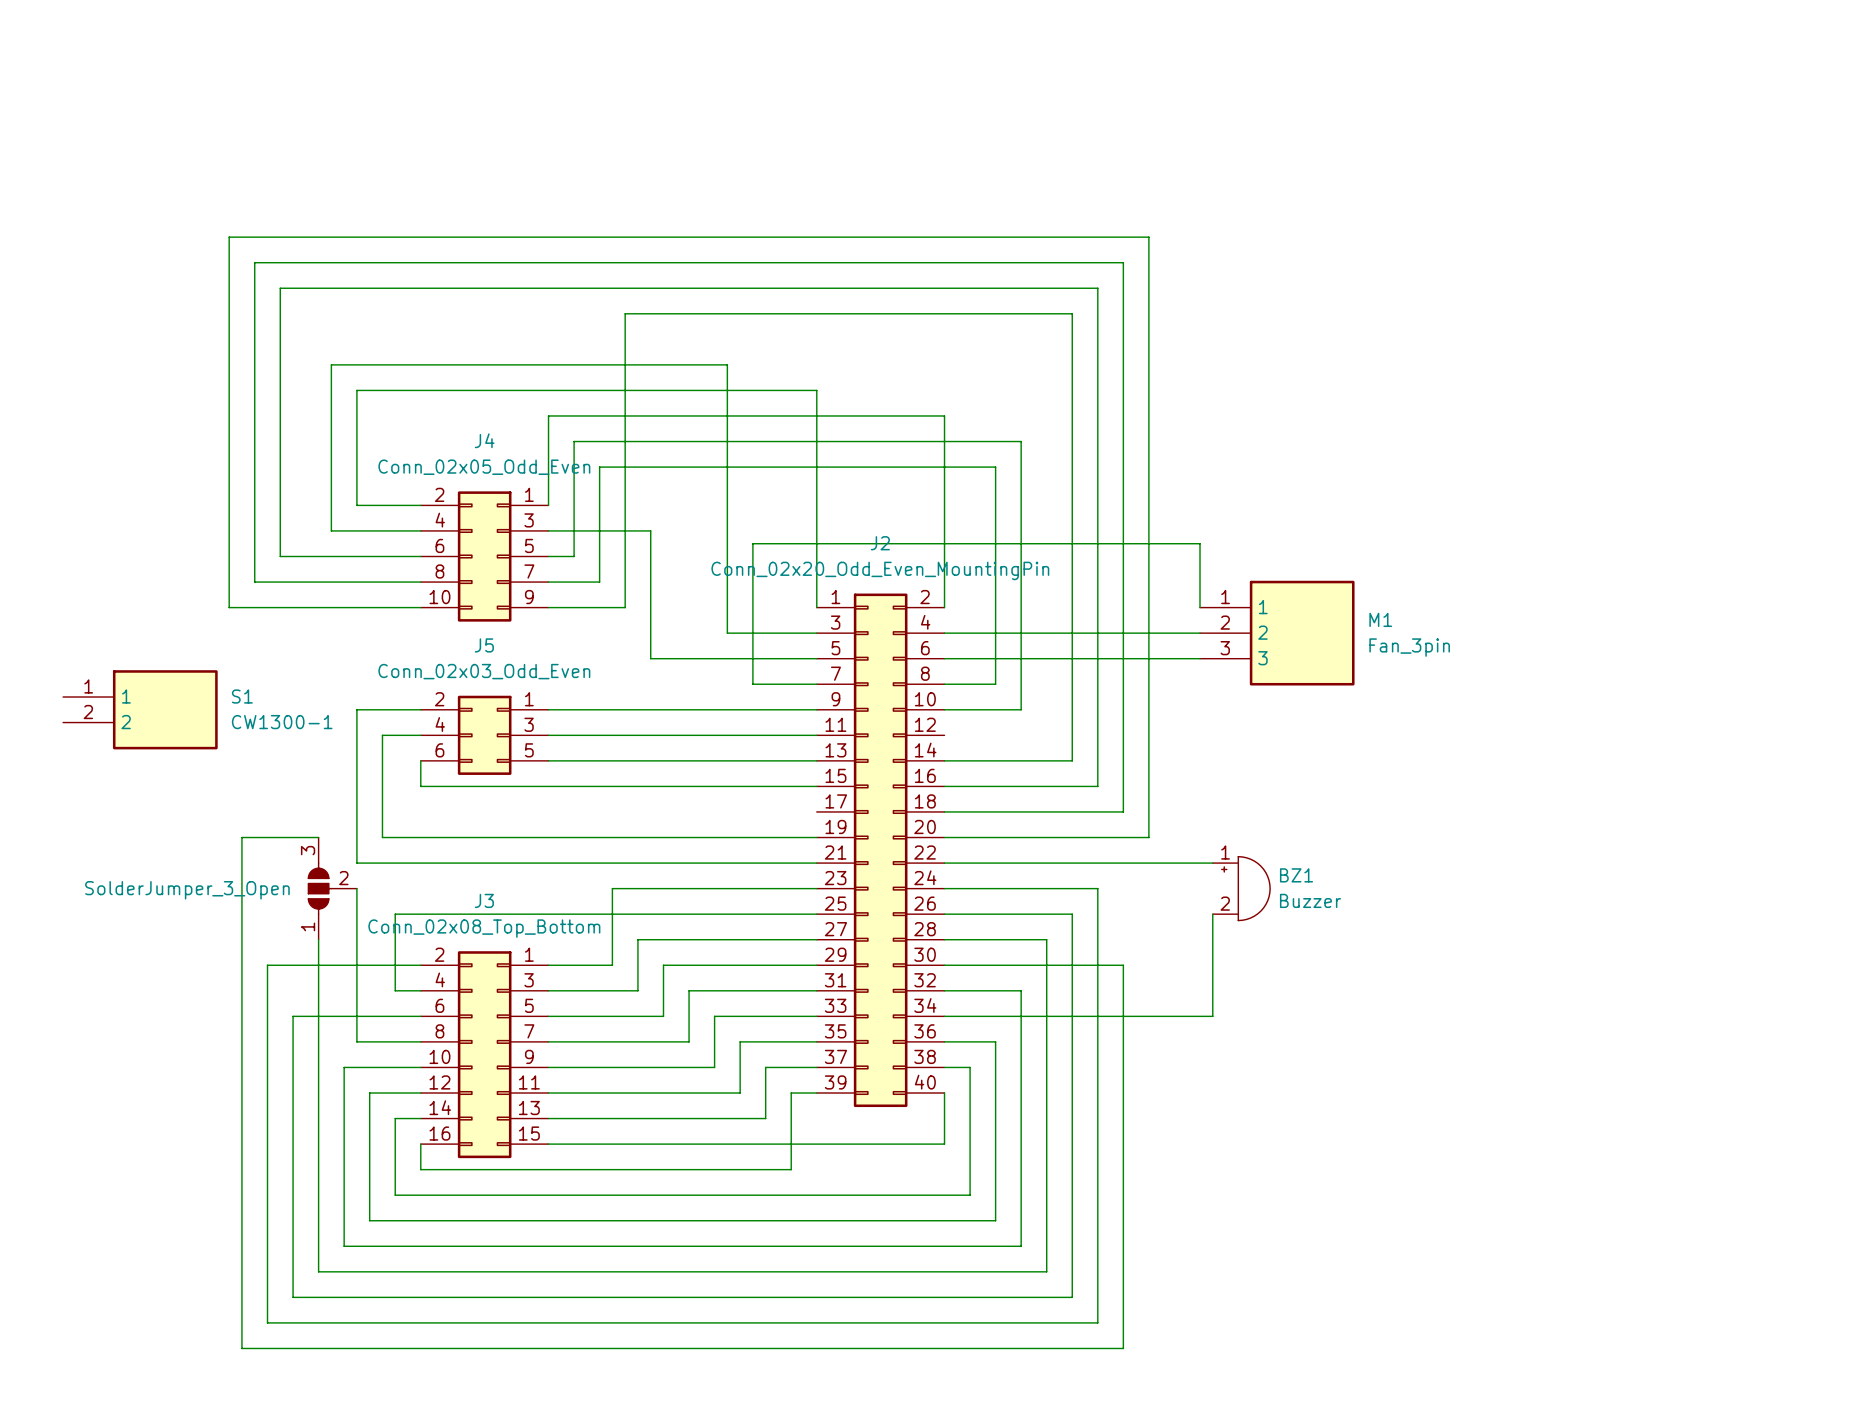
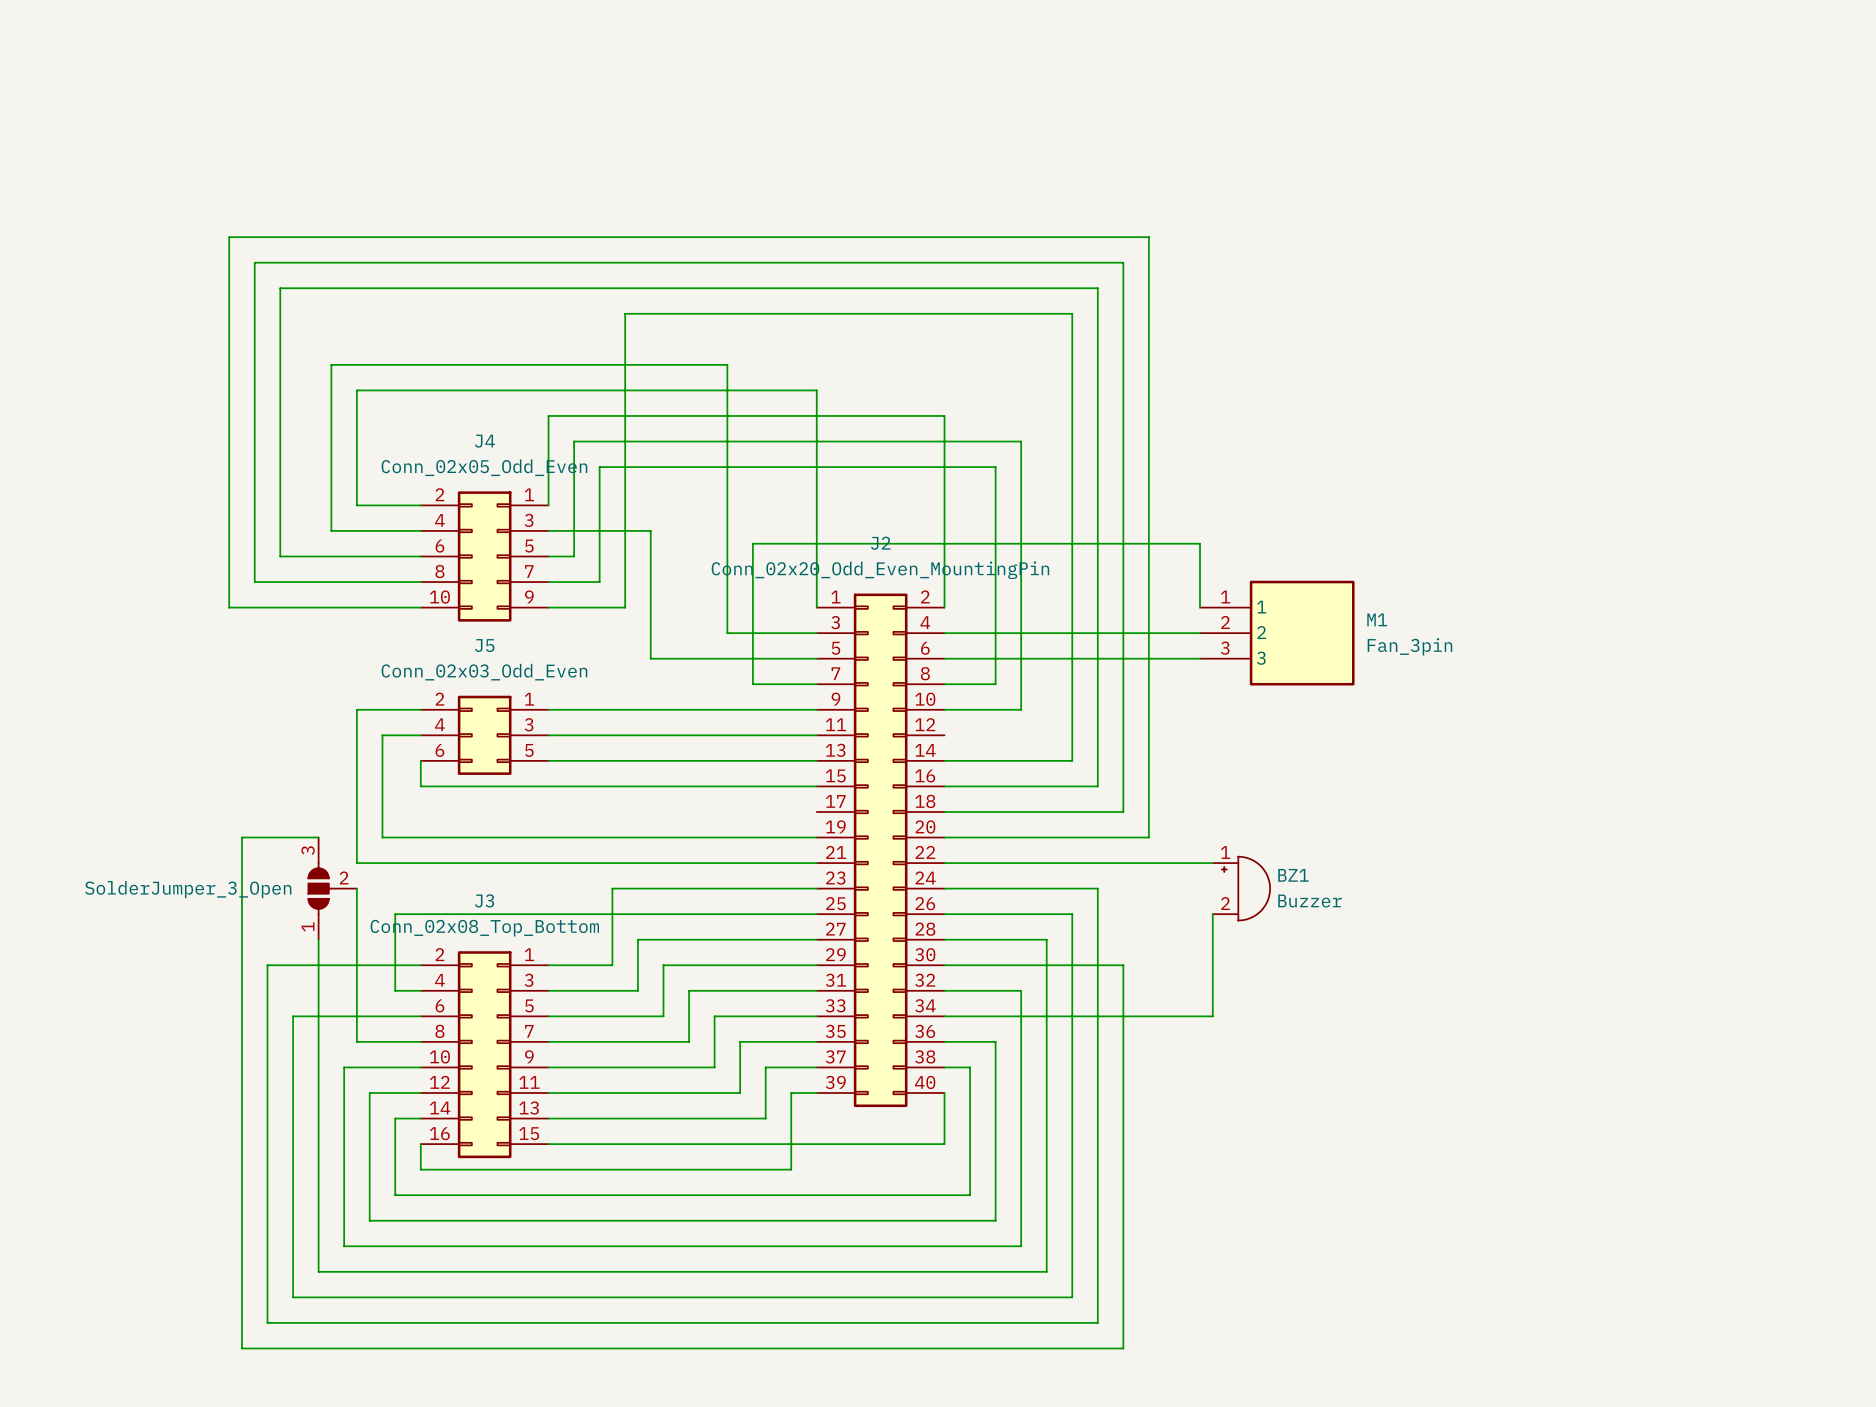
S1: CW1300-1 (140, 709) -> none

